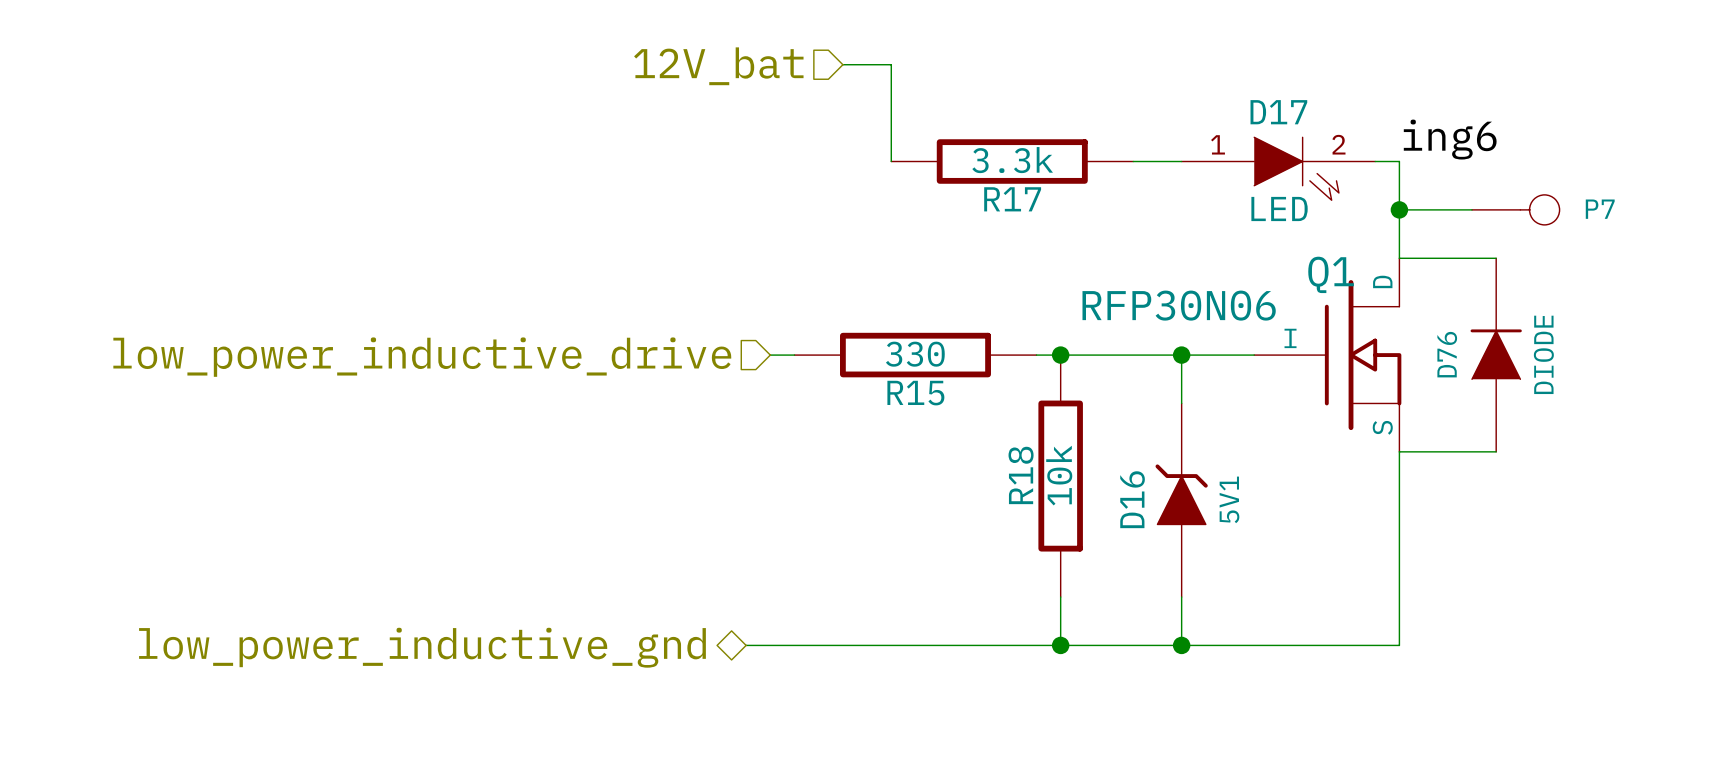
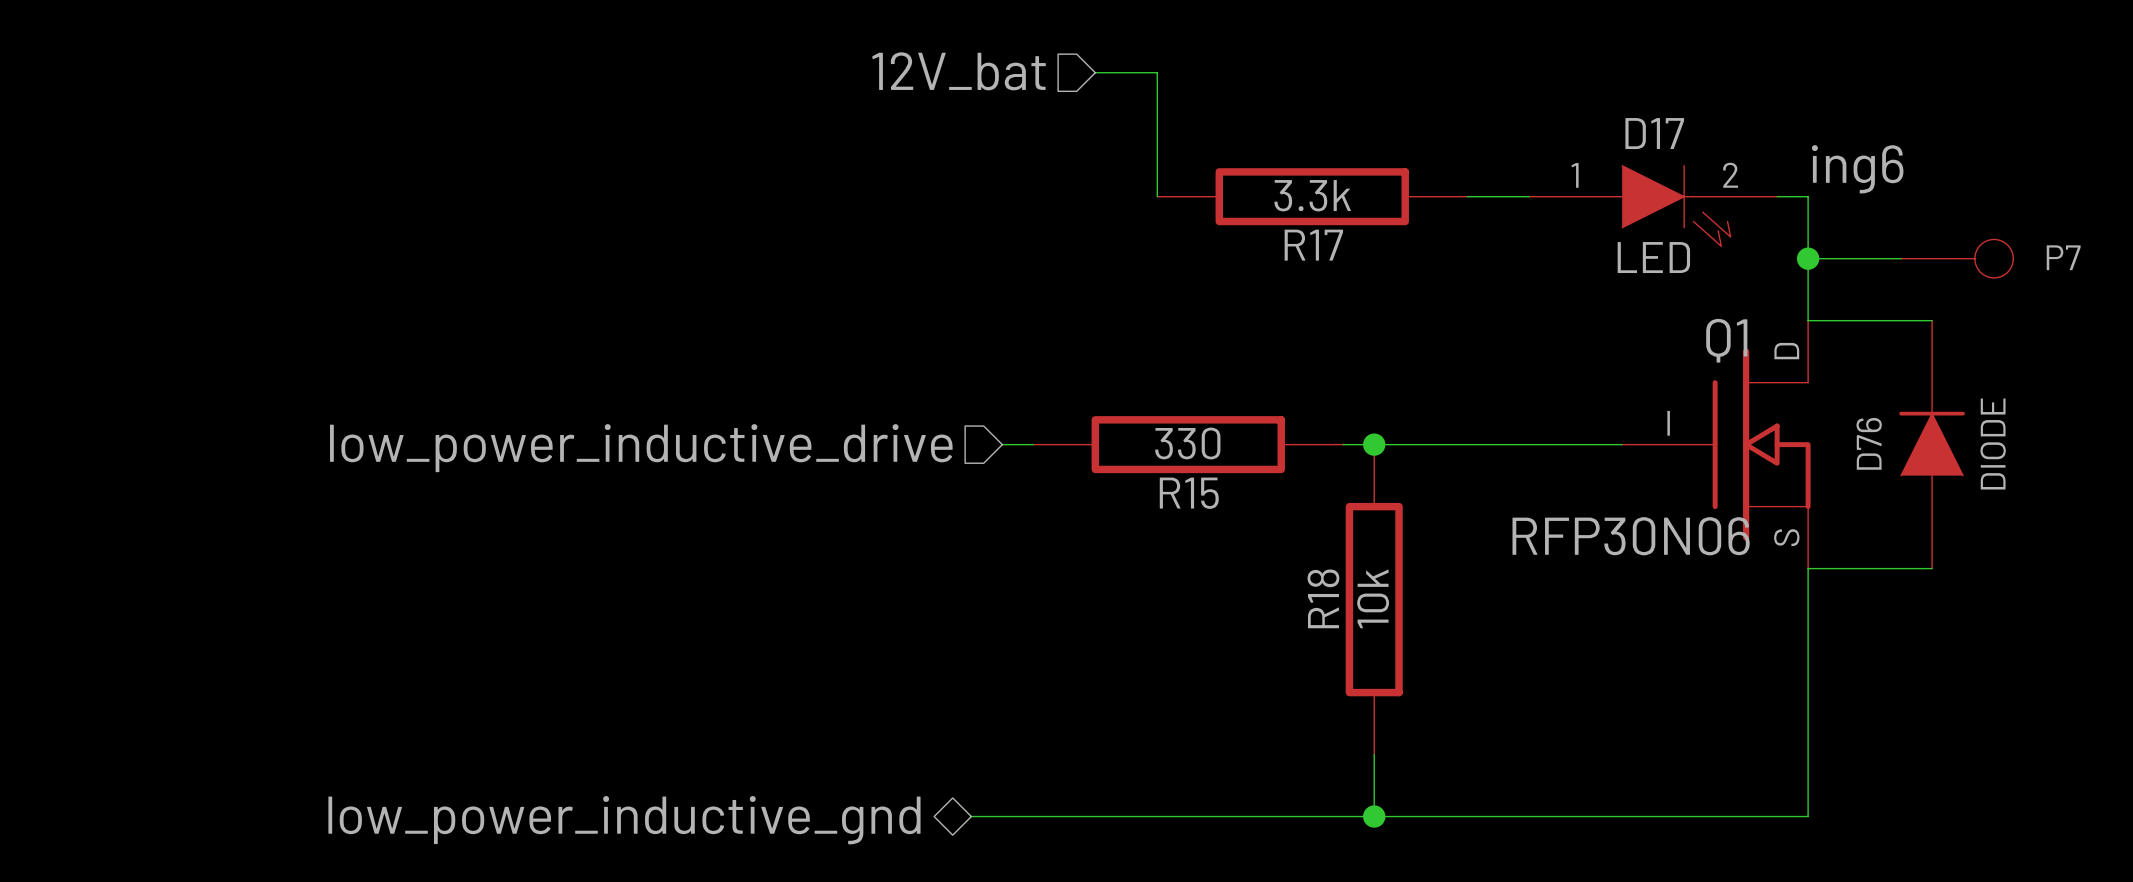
Q1 value position: RFP30N06 (1179, 305) -> RFP30N06 (1631, 536)
wire: (1181, 355) (1181, 403) -> none
junction: (1181, 355) -> none
D16: 5V1 (1181, 500) -> none
wire: (1181, 597) (1181, 645) -> none
junction: (1181, 645) -> none

